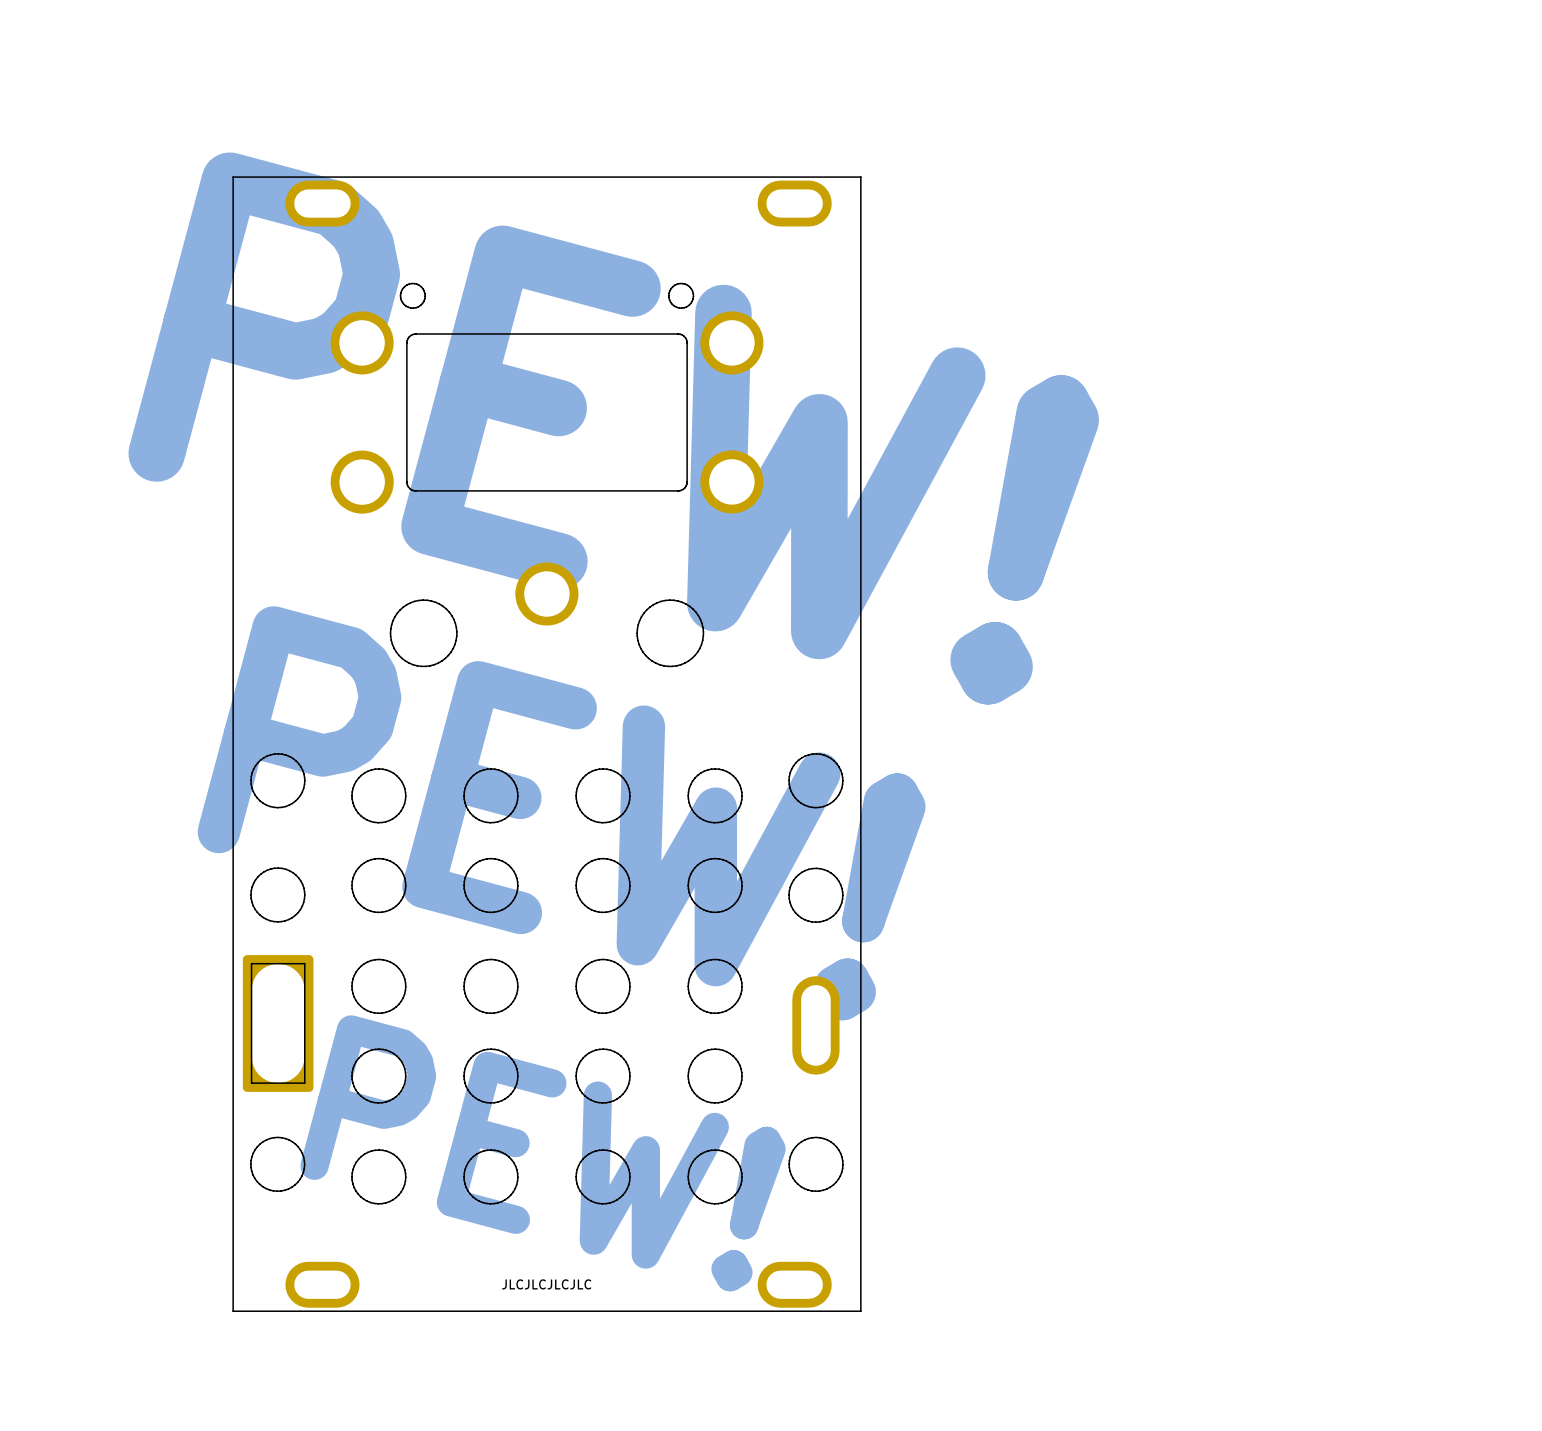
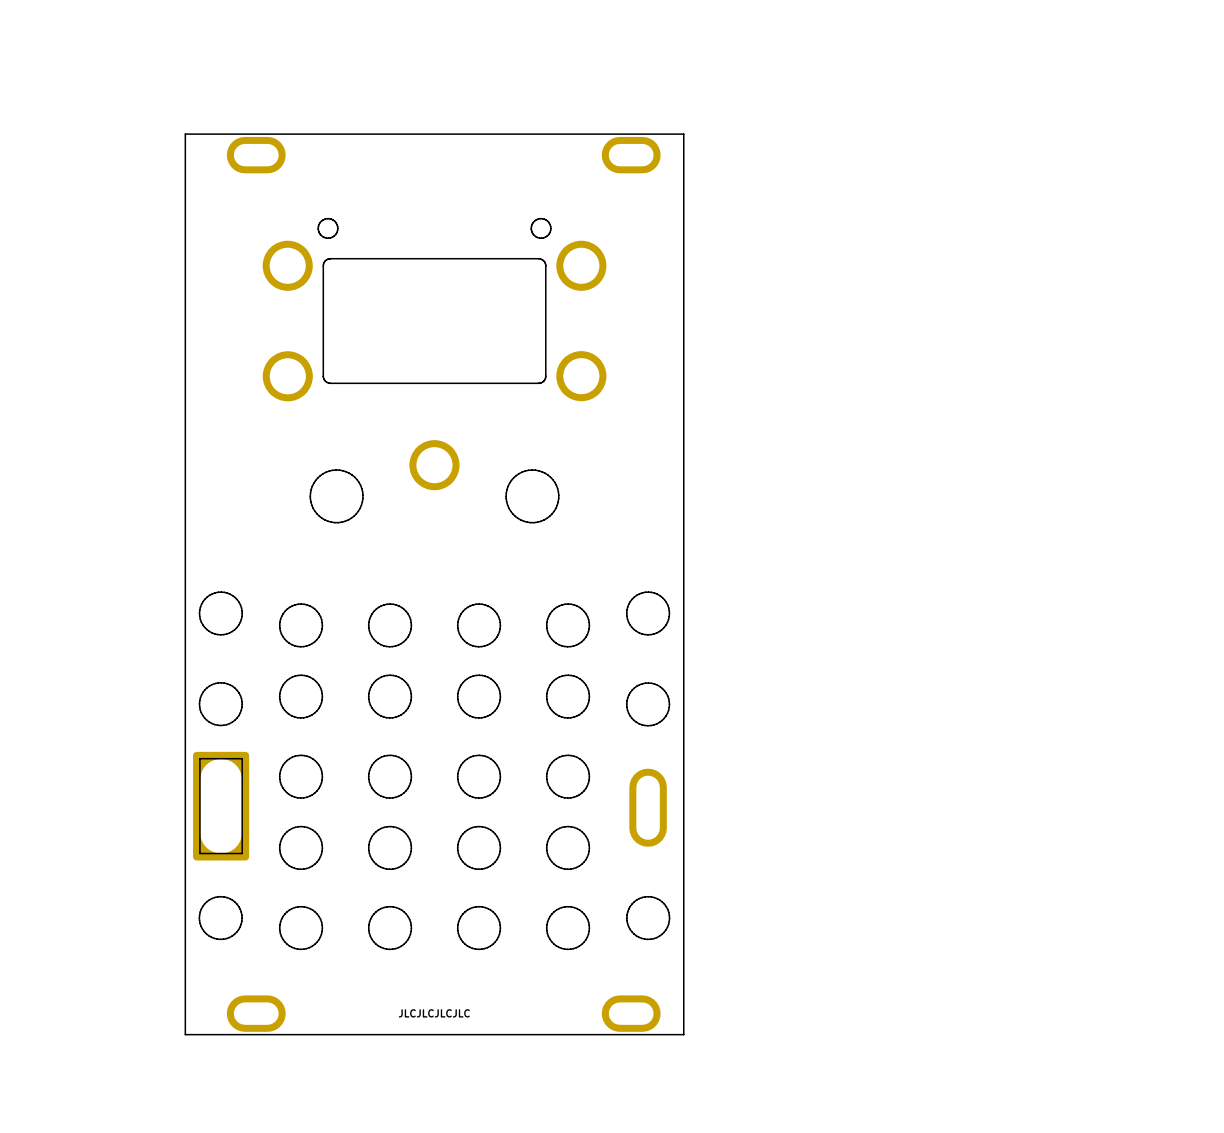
text: PEW! (613, 428) -> none
text: PEW! (561, 813) -> none
text: PEW! (543, 1153) -> none

